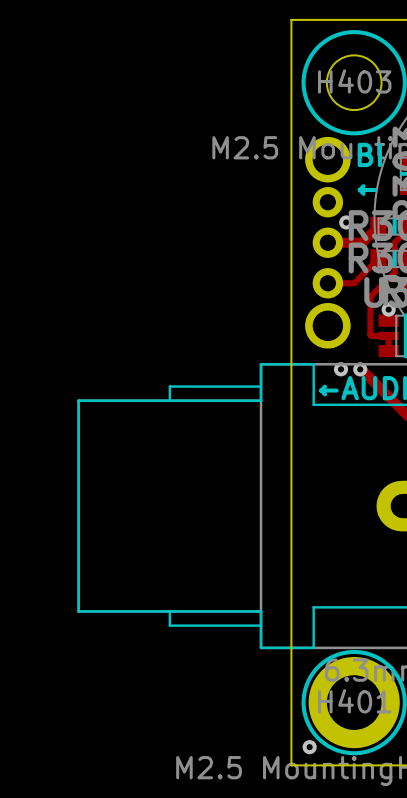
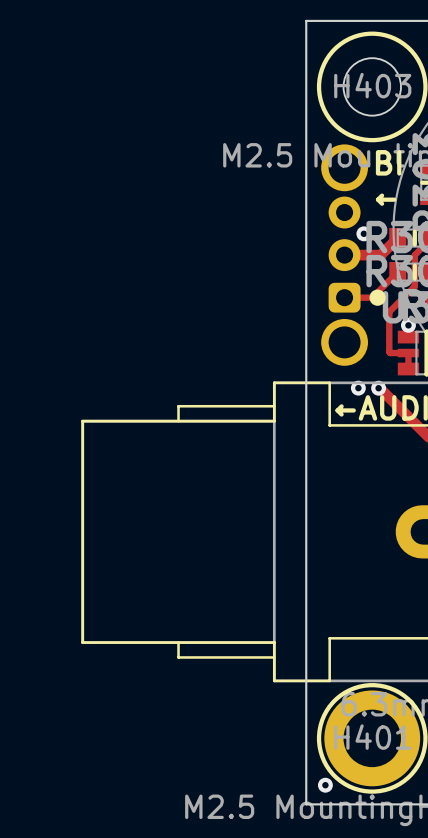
part footprint: [305, 136, 351, 349] -> [321, 144, 386, 366]

